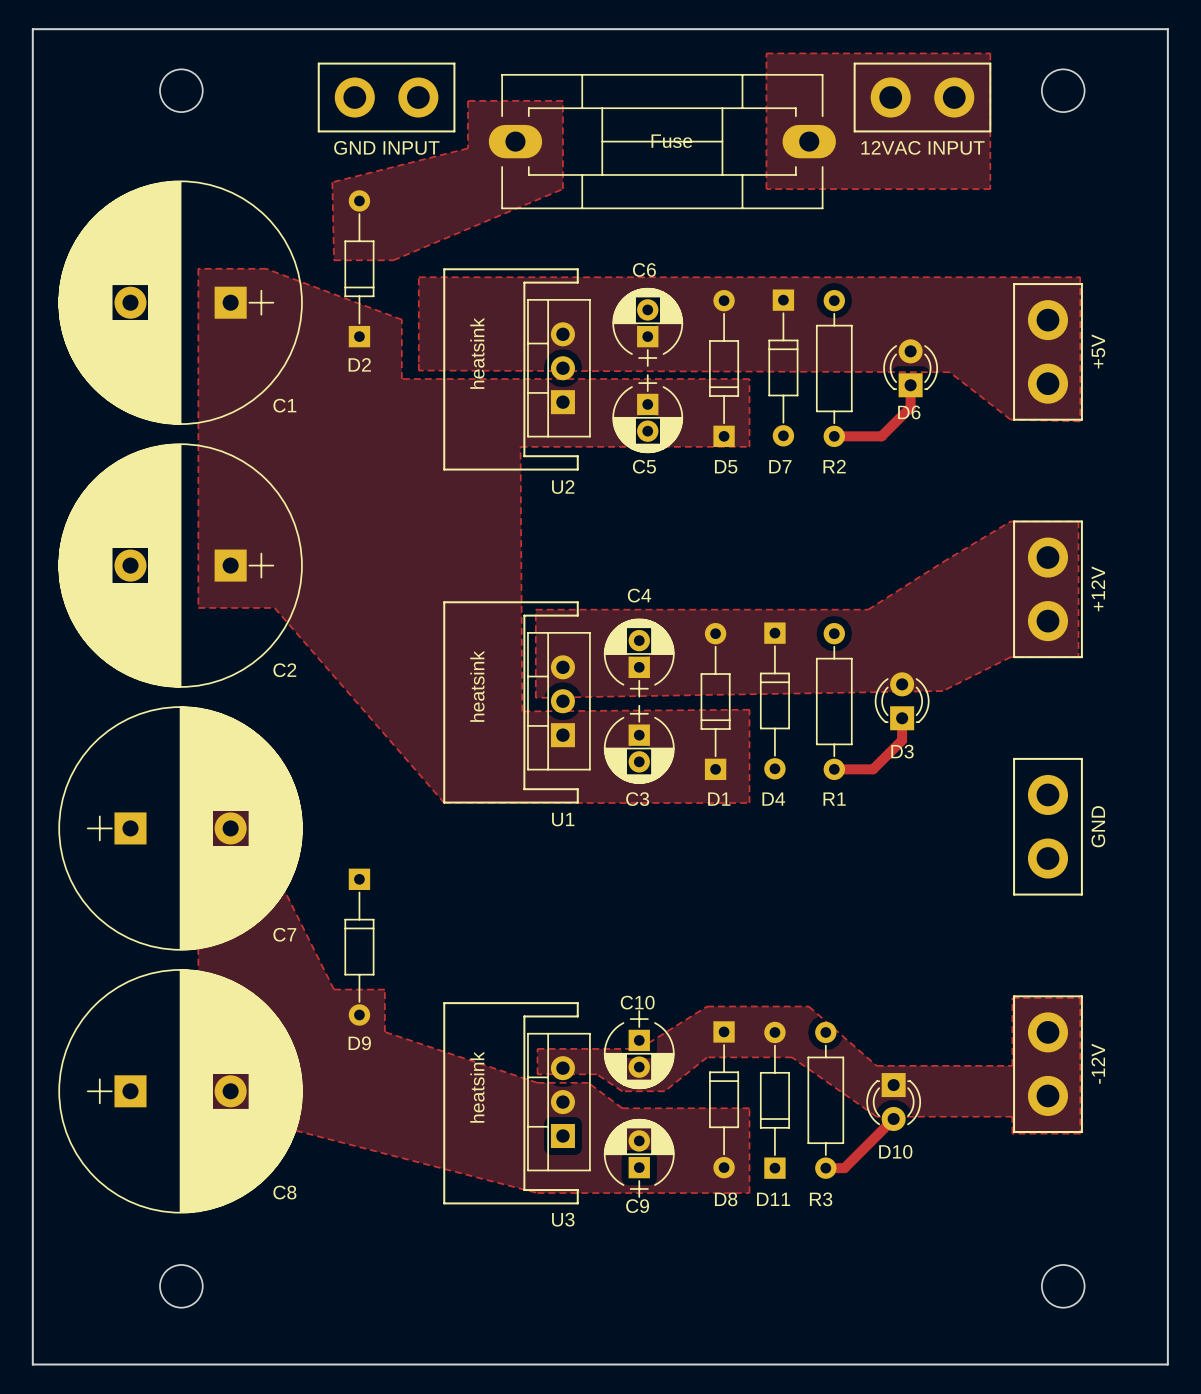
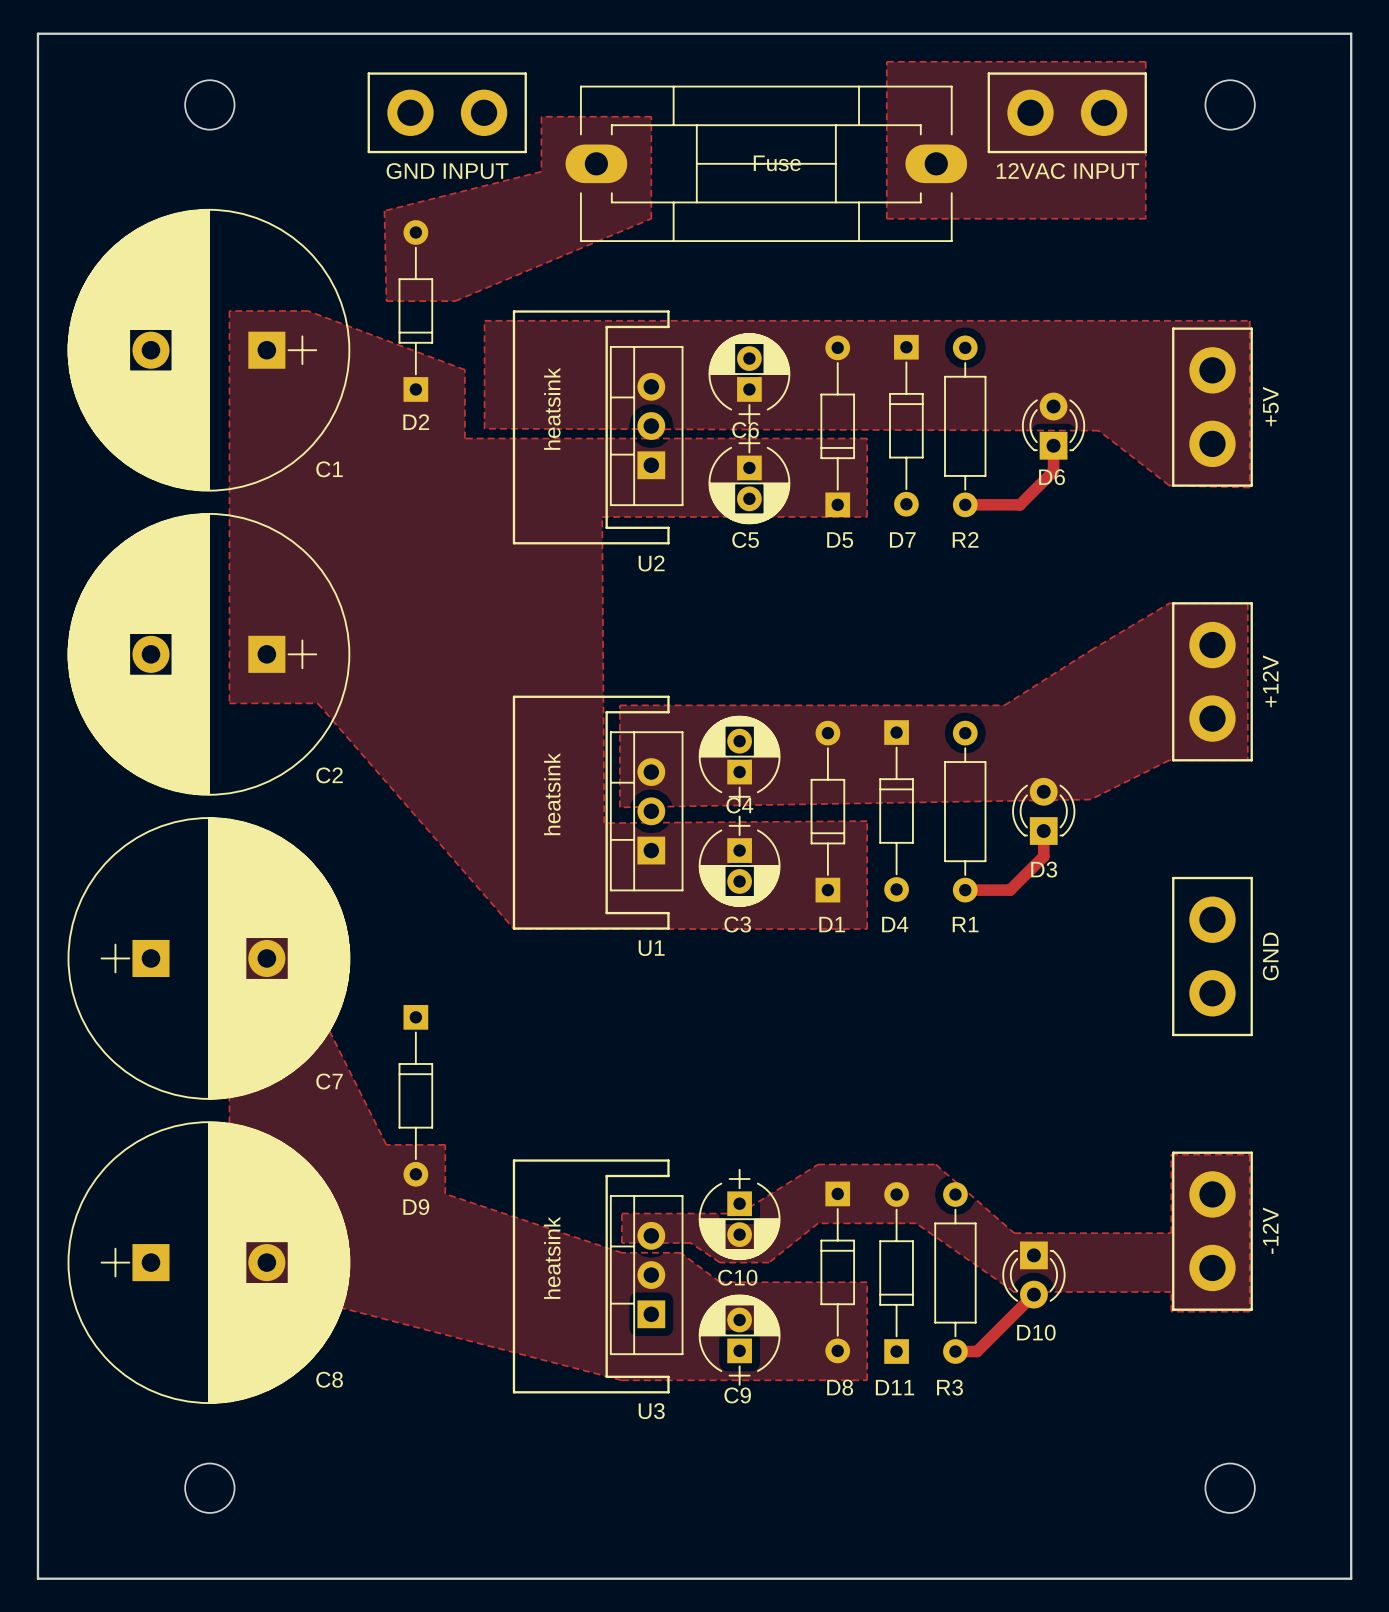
C6 name position: C6 (644, 269) -> C6 (745, 430)
C4 name position: C4 (639, 595) -> C4 (739, 805)
C10 name position: C10 (637, 1002) -> C10 (737, 1277)

